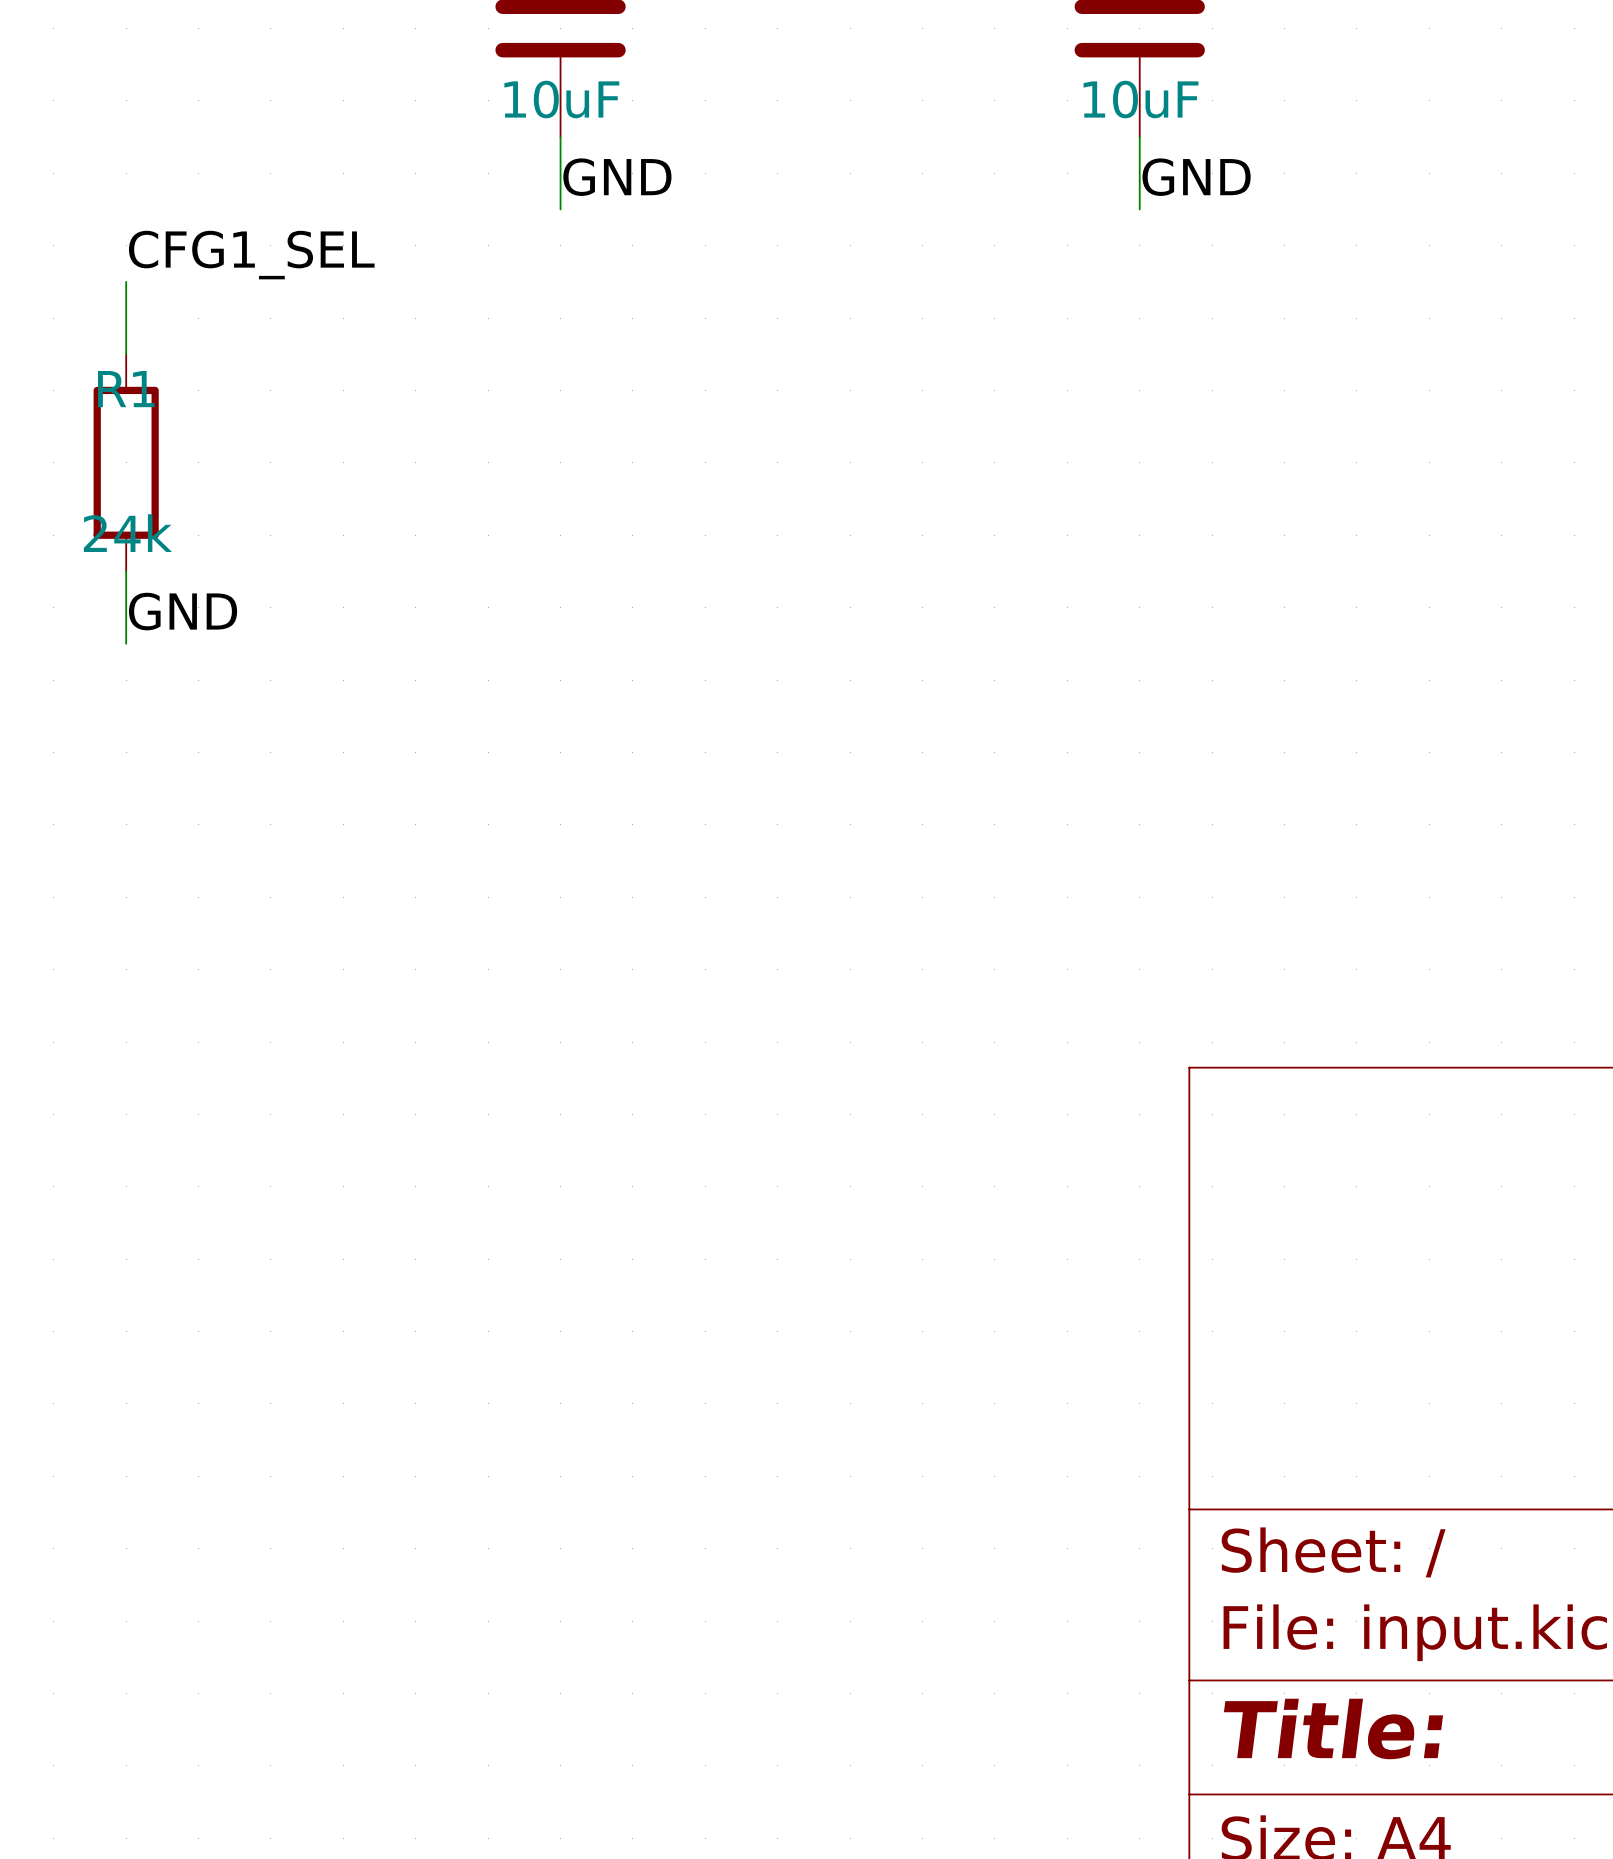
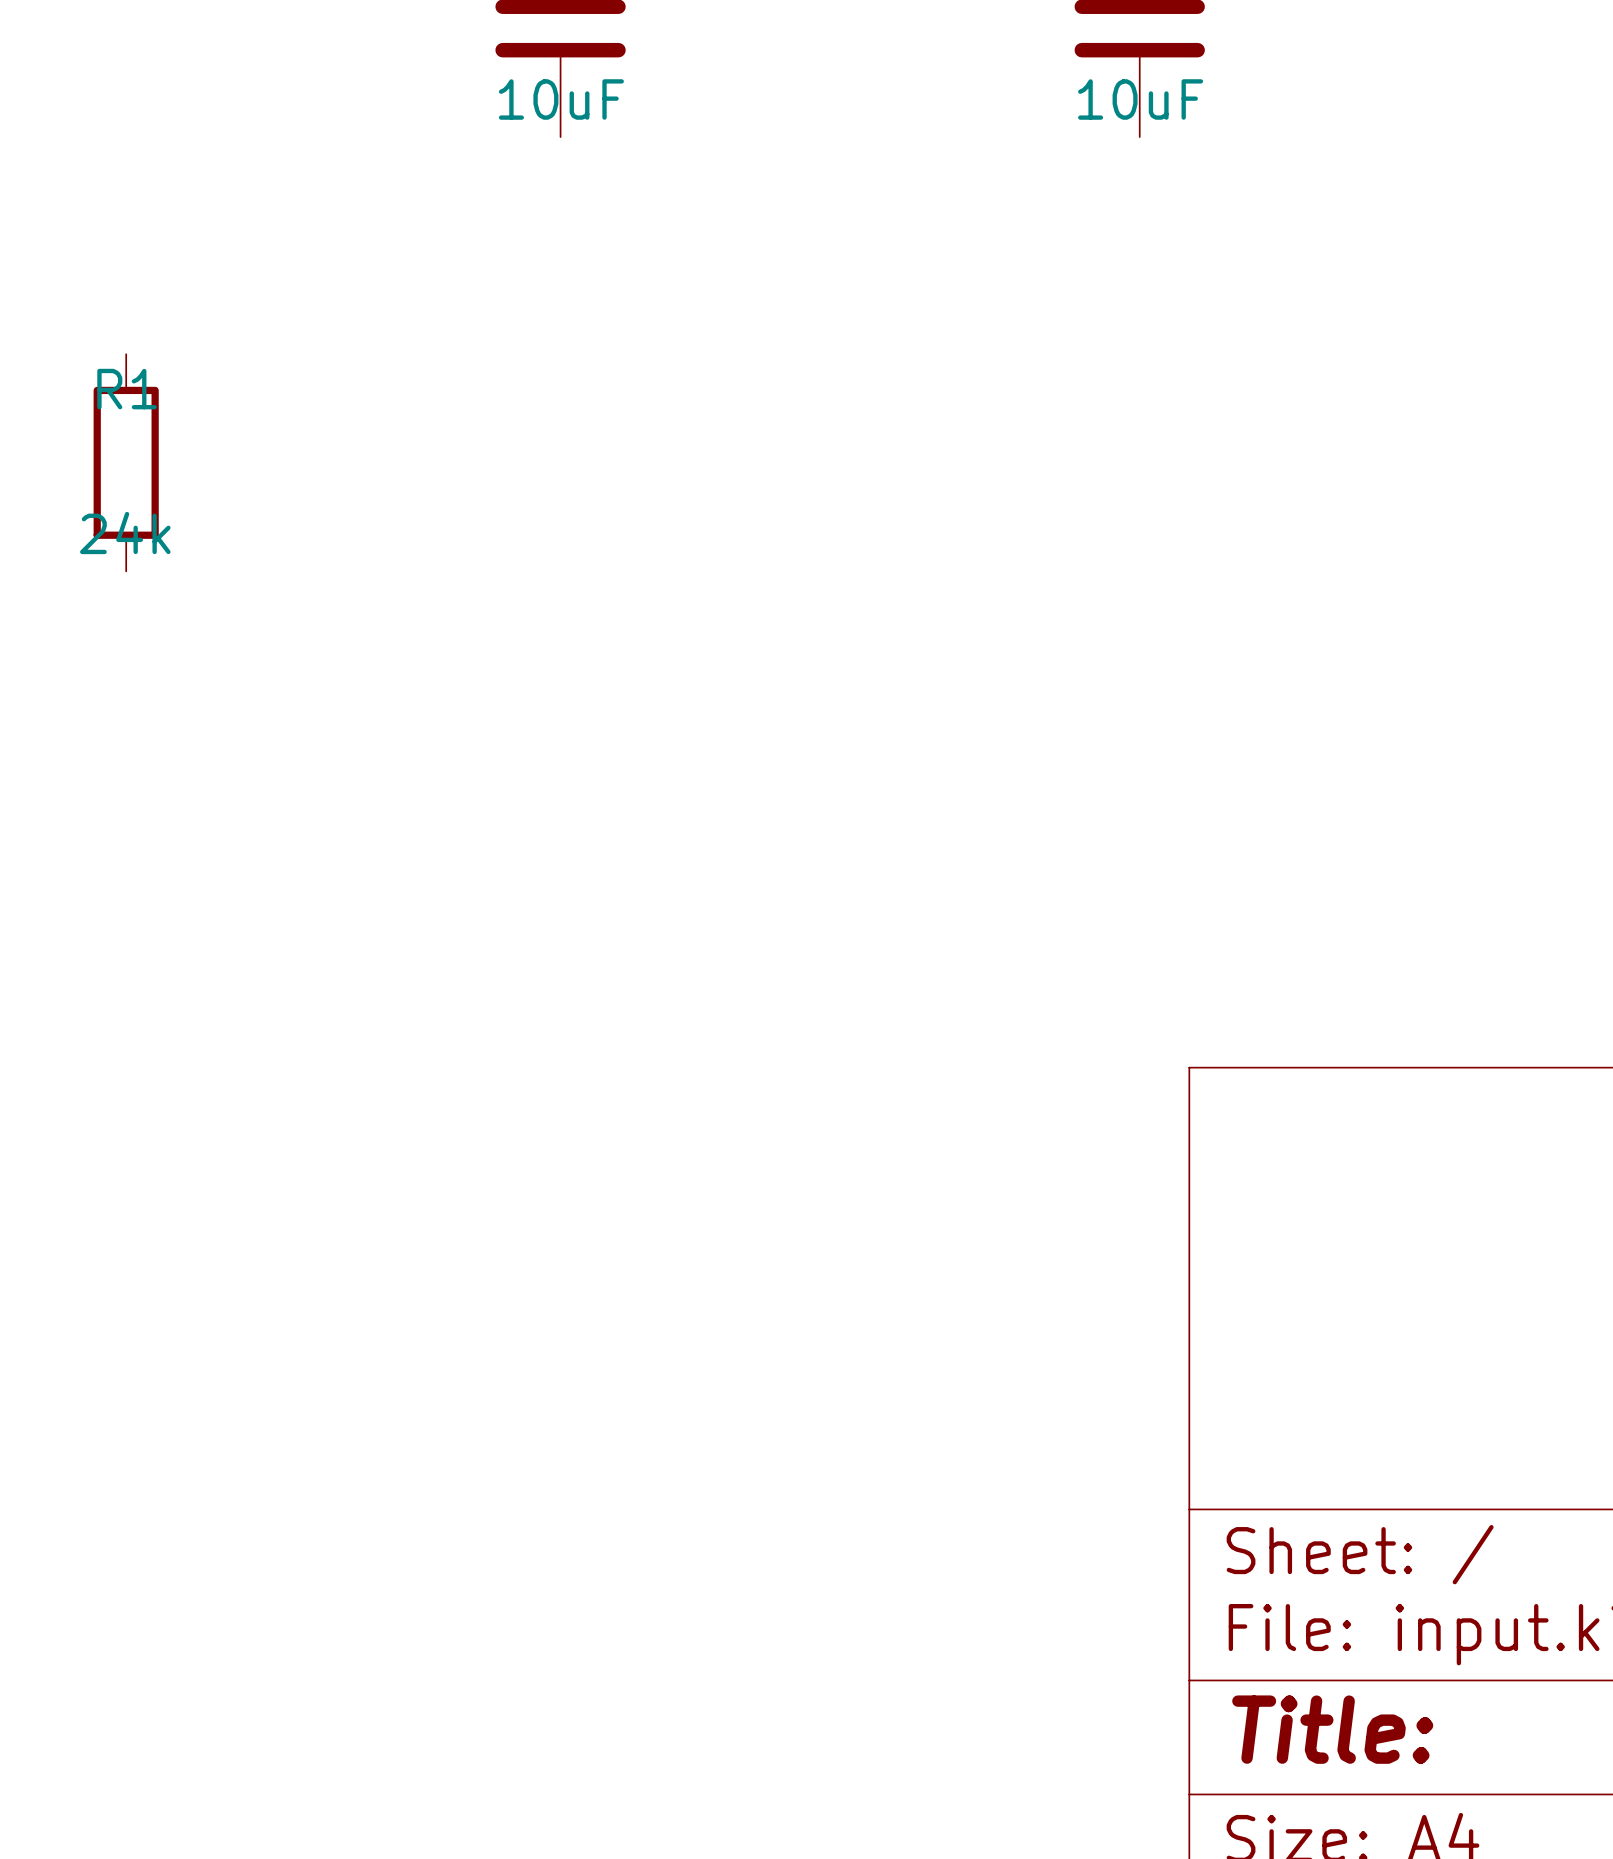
wire: (560, 137) (560, 209) -> none
wire: (1139, 137) (1139, 209) -> none
label: GND (617, 177) -> none
label: GND (1196, 177) -> none
label: CFG1_SEL (251, 255) -> none
wire: (126, 281) (126, 354) -> none
wire: (126, 571) (126, 643) -> none
label: GND (183, 611) -> none

